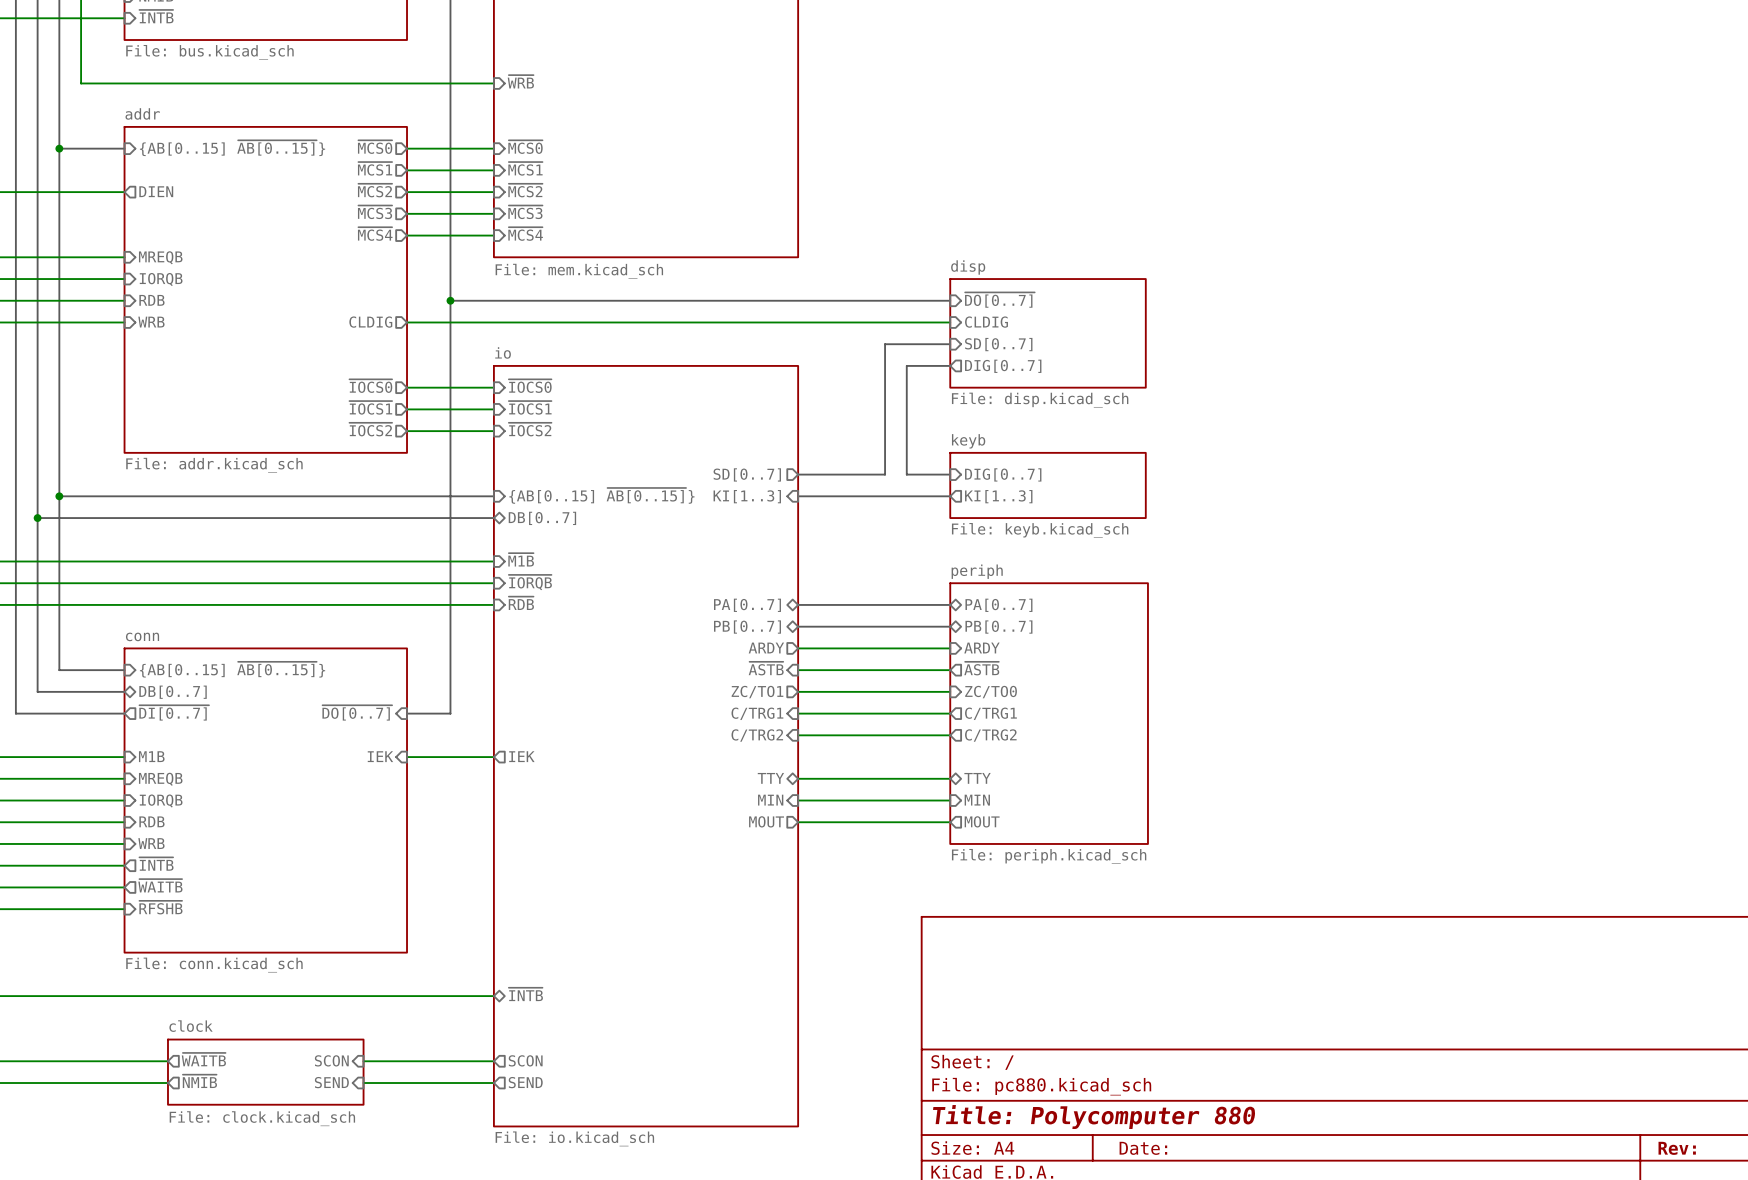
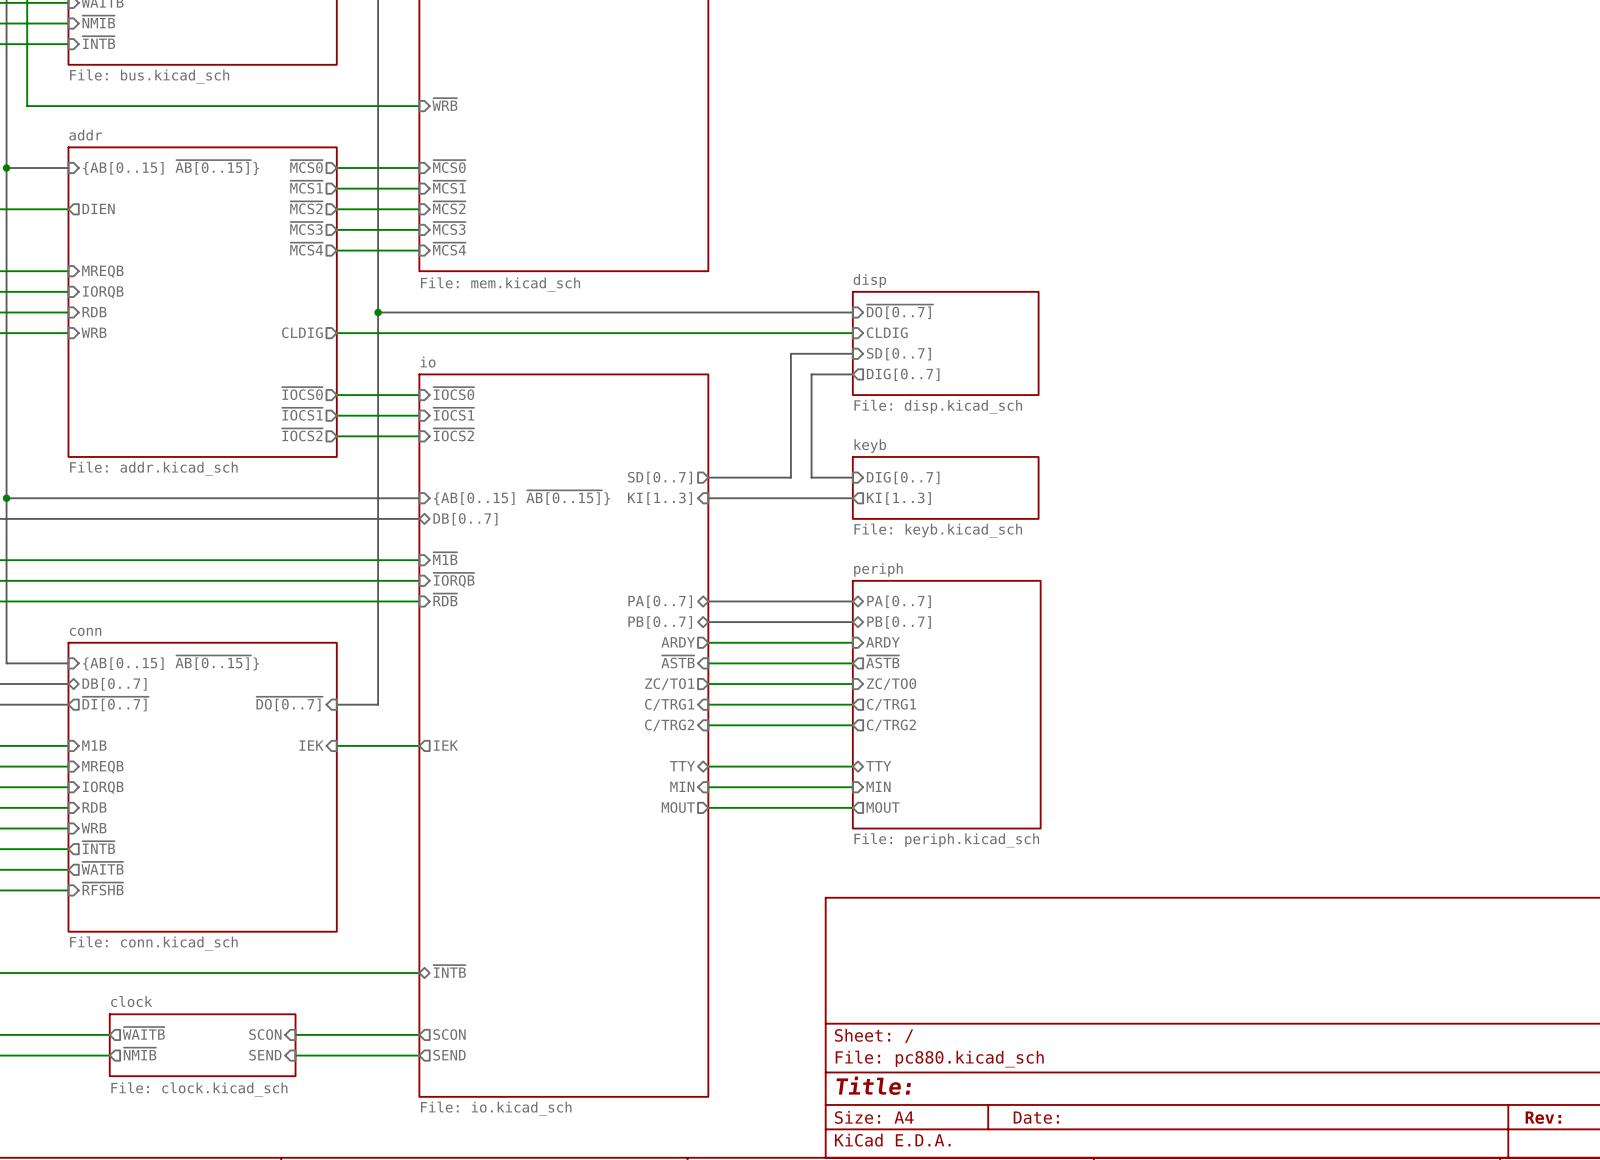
title block: Title: Polycomputer 880 (1094, 1117) -> Title: (873, 1085)

